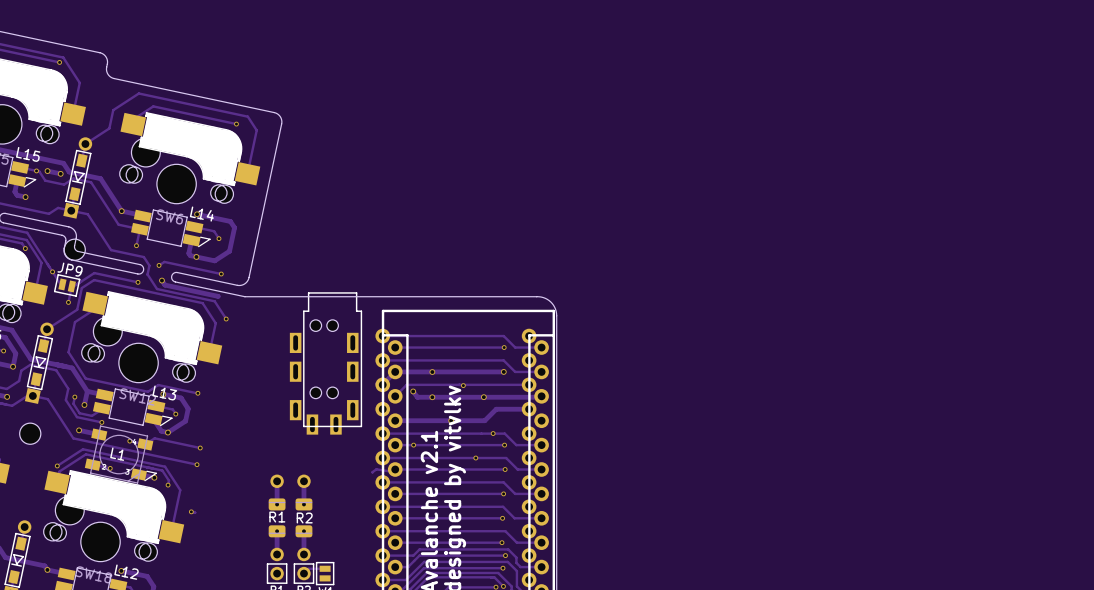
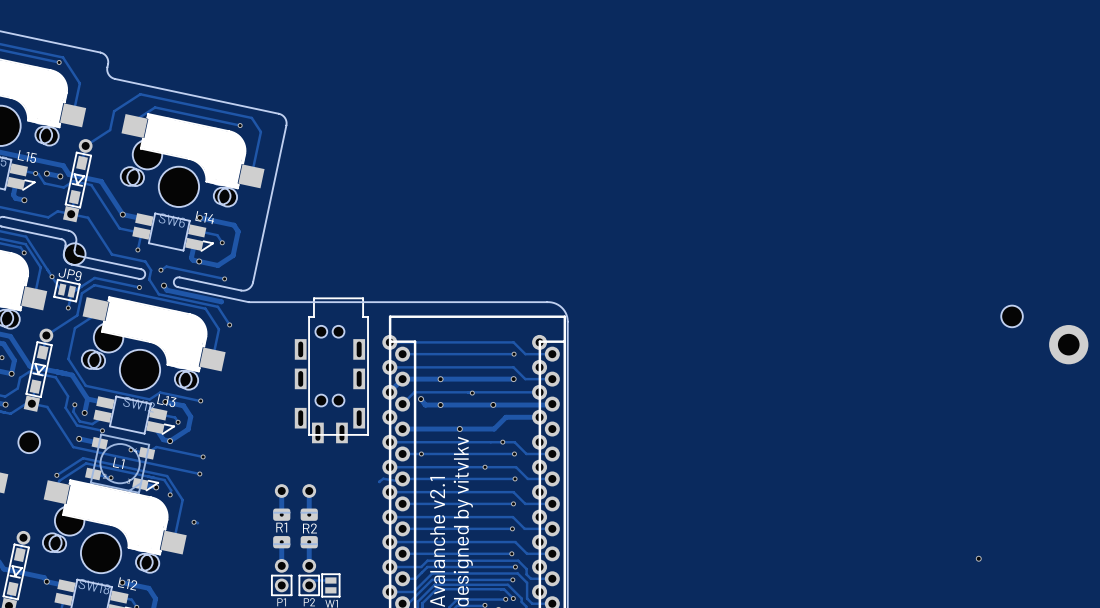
part: none -> (1012, 316)
part: none -> (1068, 344)
via: none -> (978, 558)

